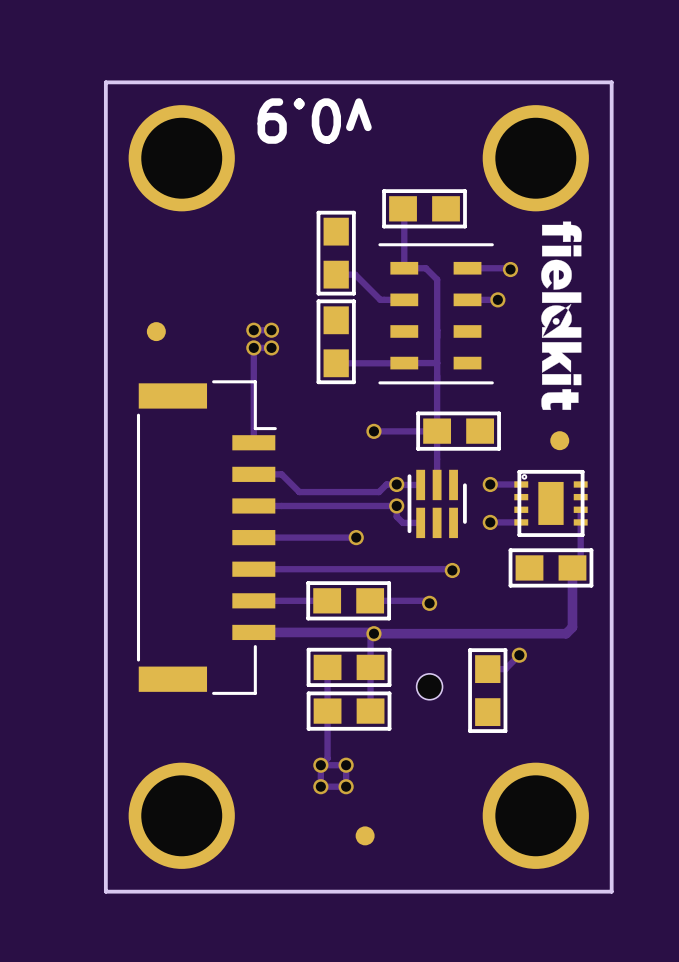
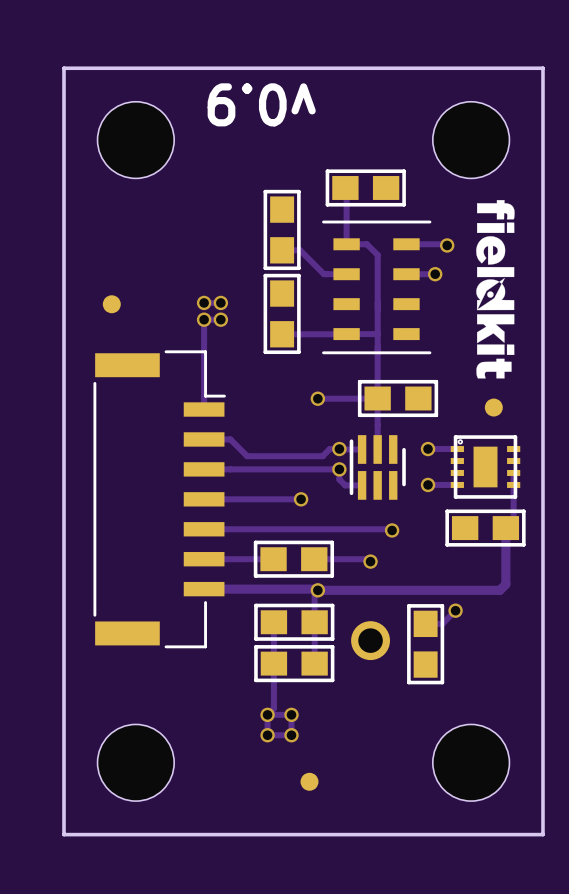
part footprint: [128, 105, 235, 212] -> [97, 101, 175, 179]
part footprint: [482, 105, 589, 212] -> [432, 101, 510, 179]
part footprint: [416, 673, 443, 700] -> [351, 621, 390, 661]
part footprint: [128, 762, 235, 869] -> [97, 724, 175, 802]
part footprint: [482, 762, 589, 869] -> [432, 724, 510, 802]

